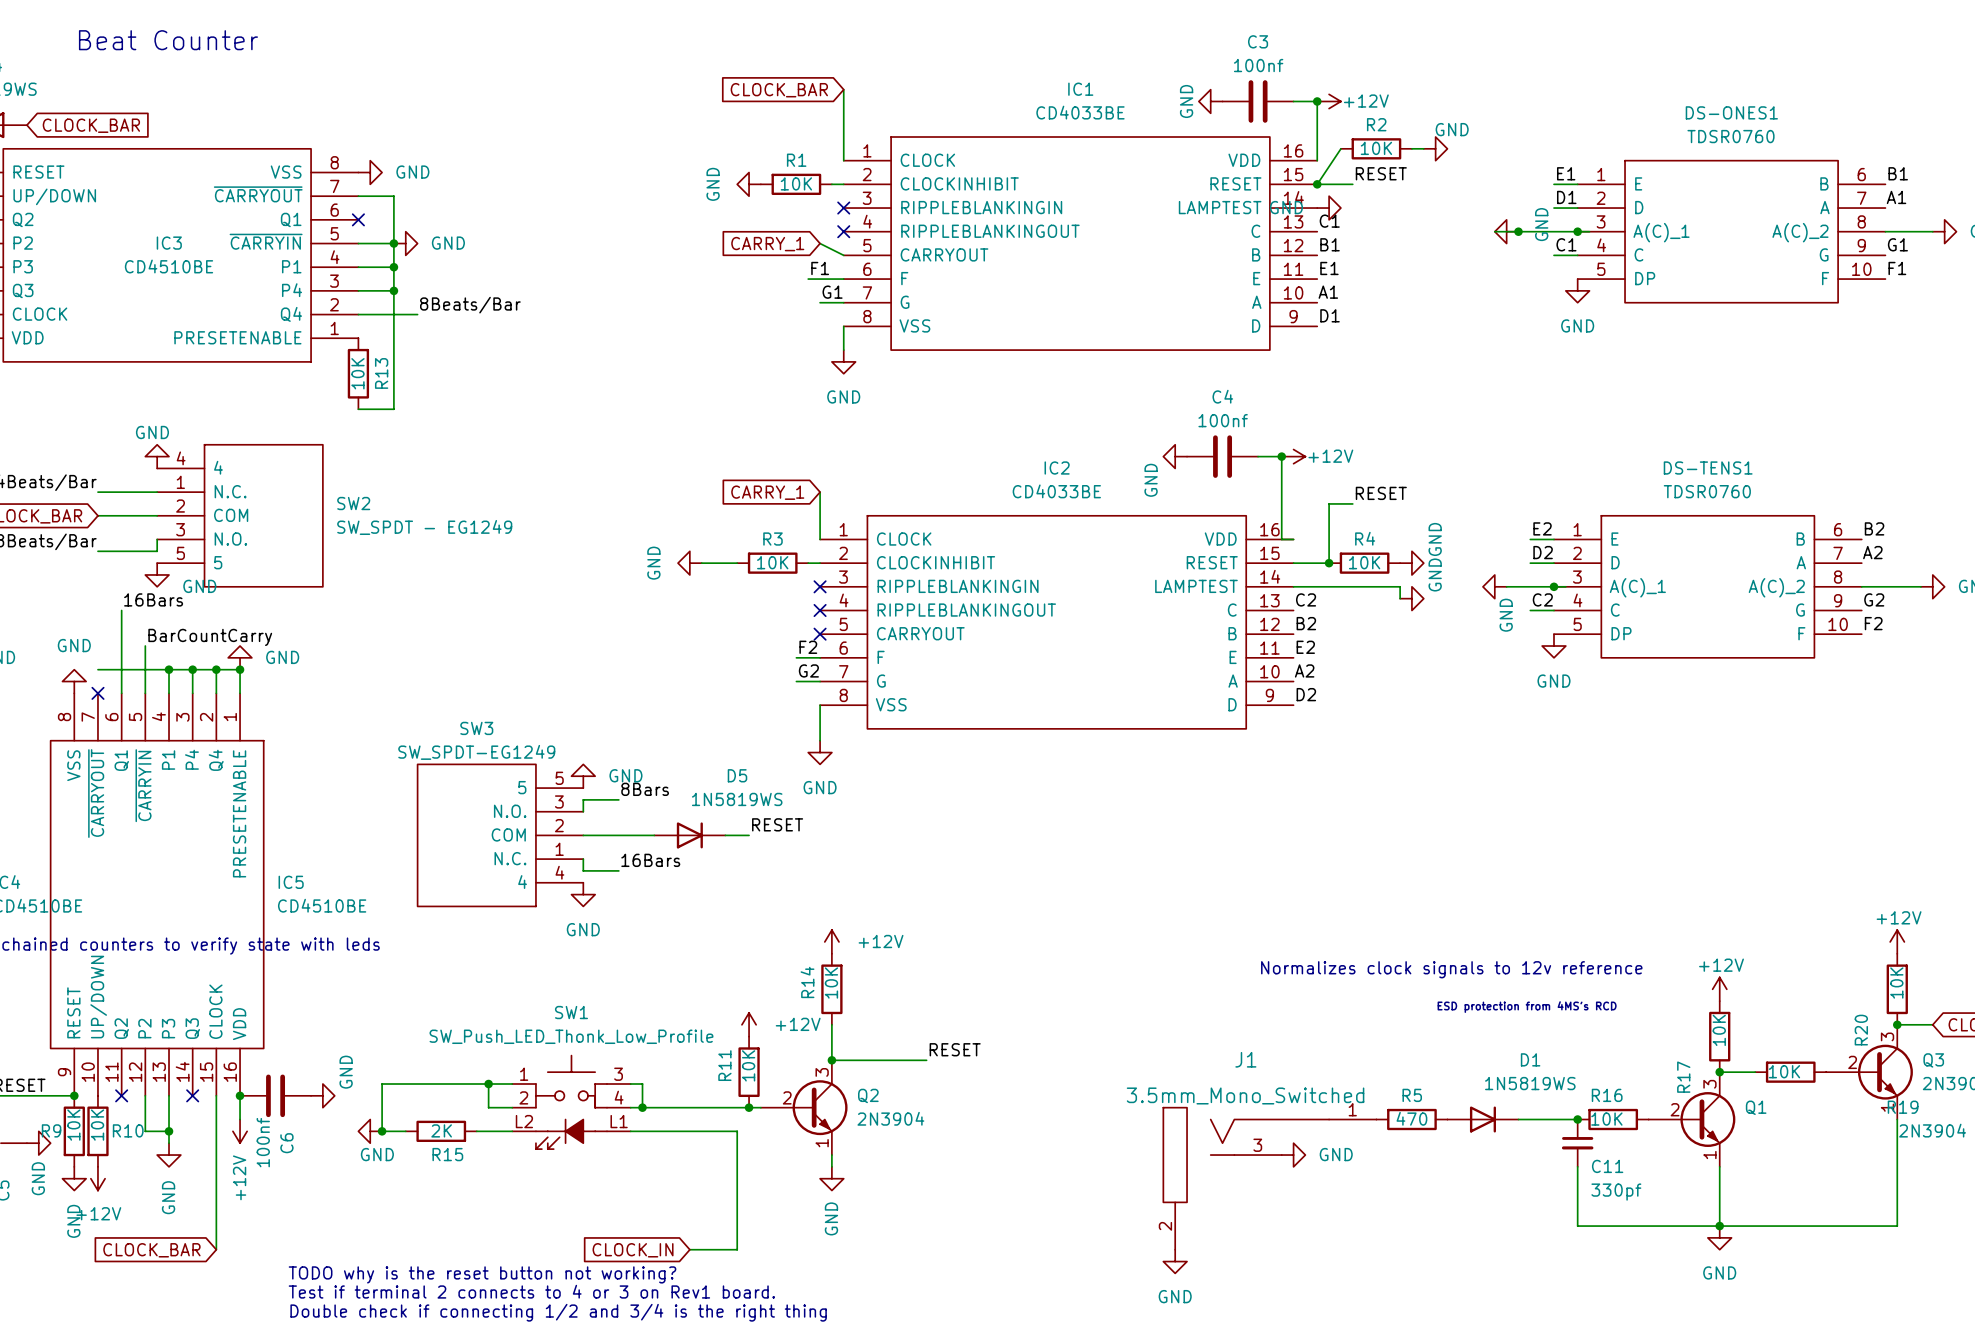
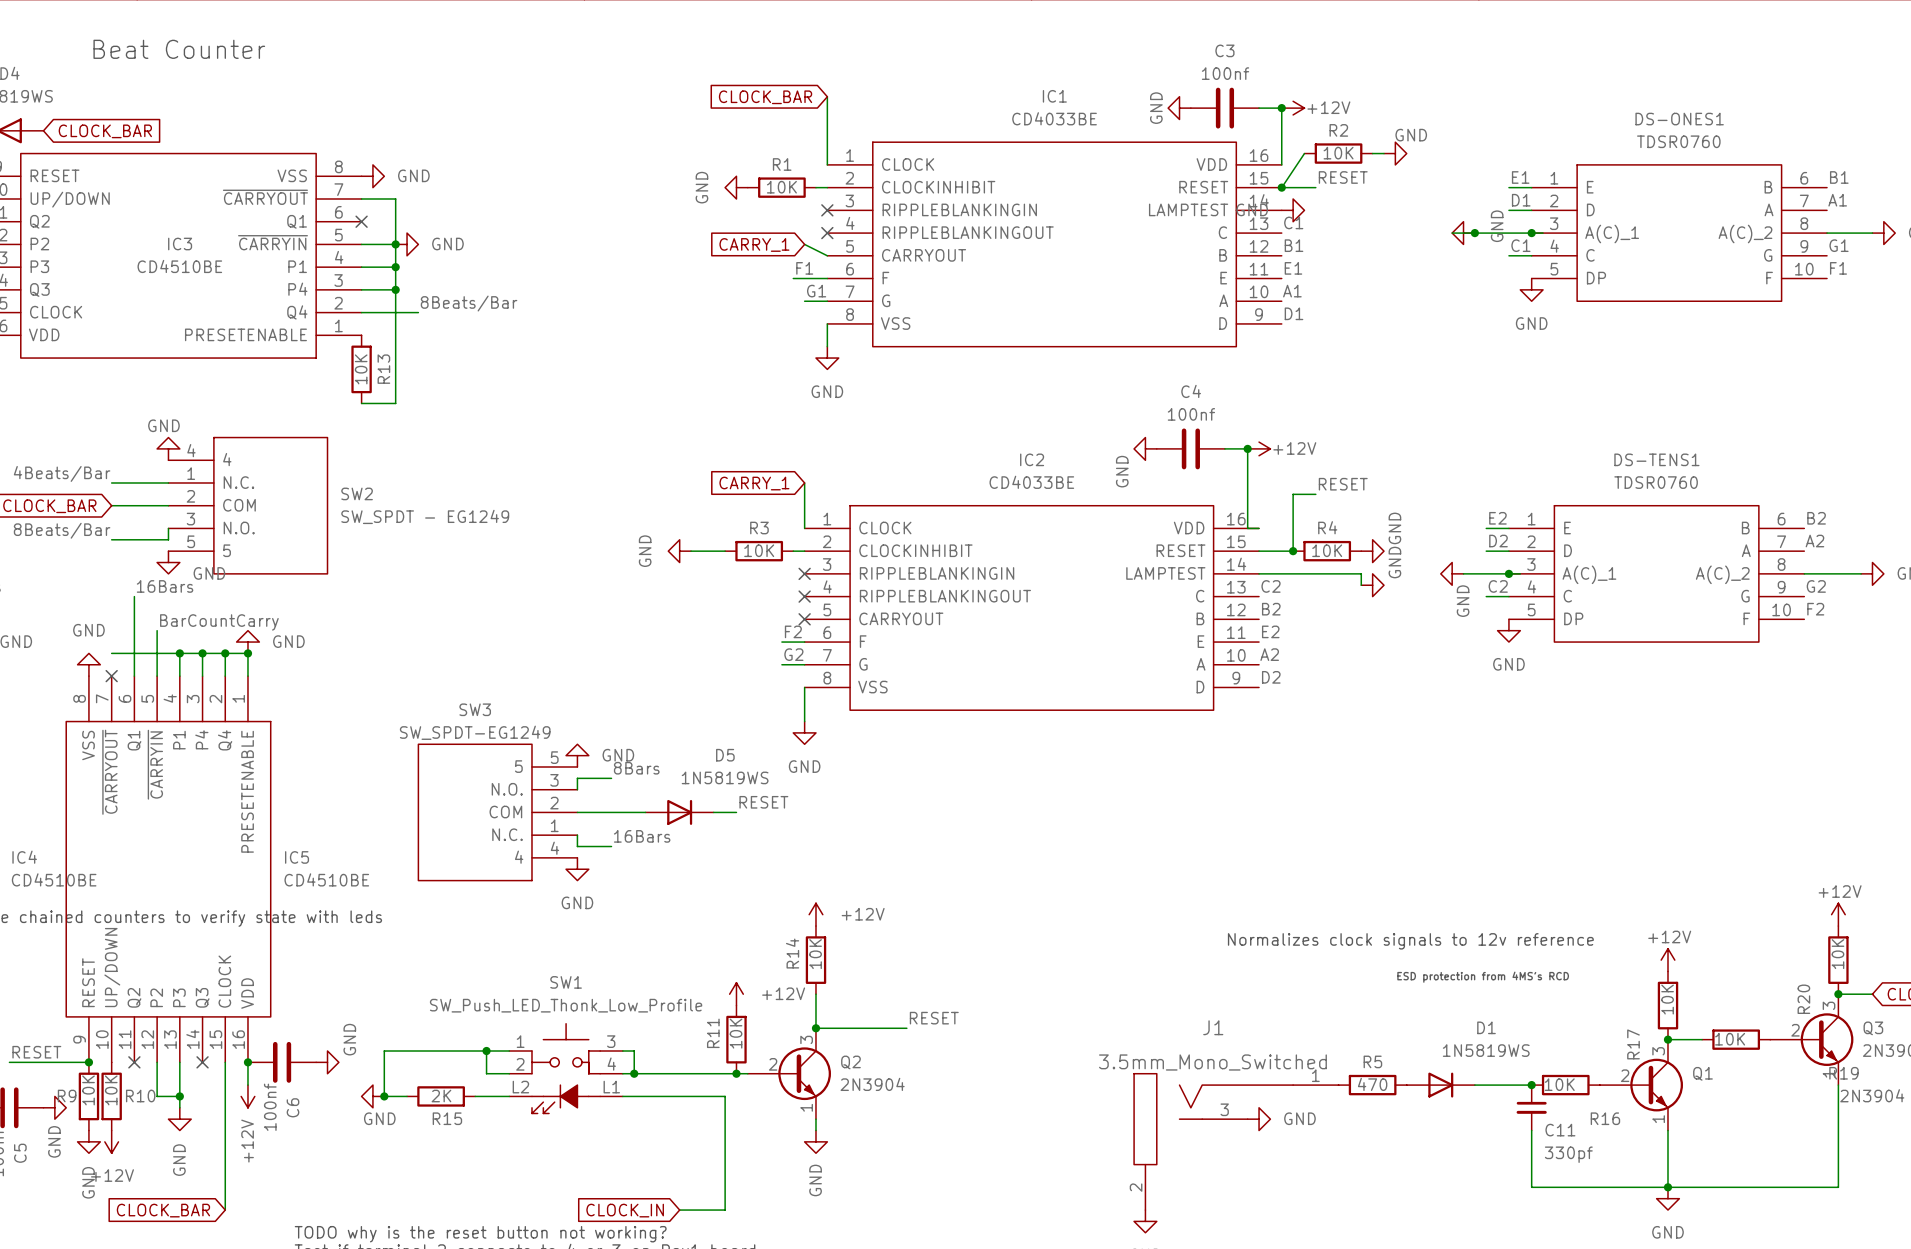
R16 name position: R16 (1607, 1095) -> R16 (1605, 1118)

